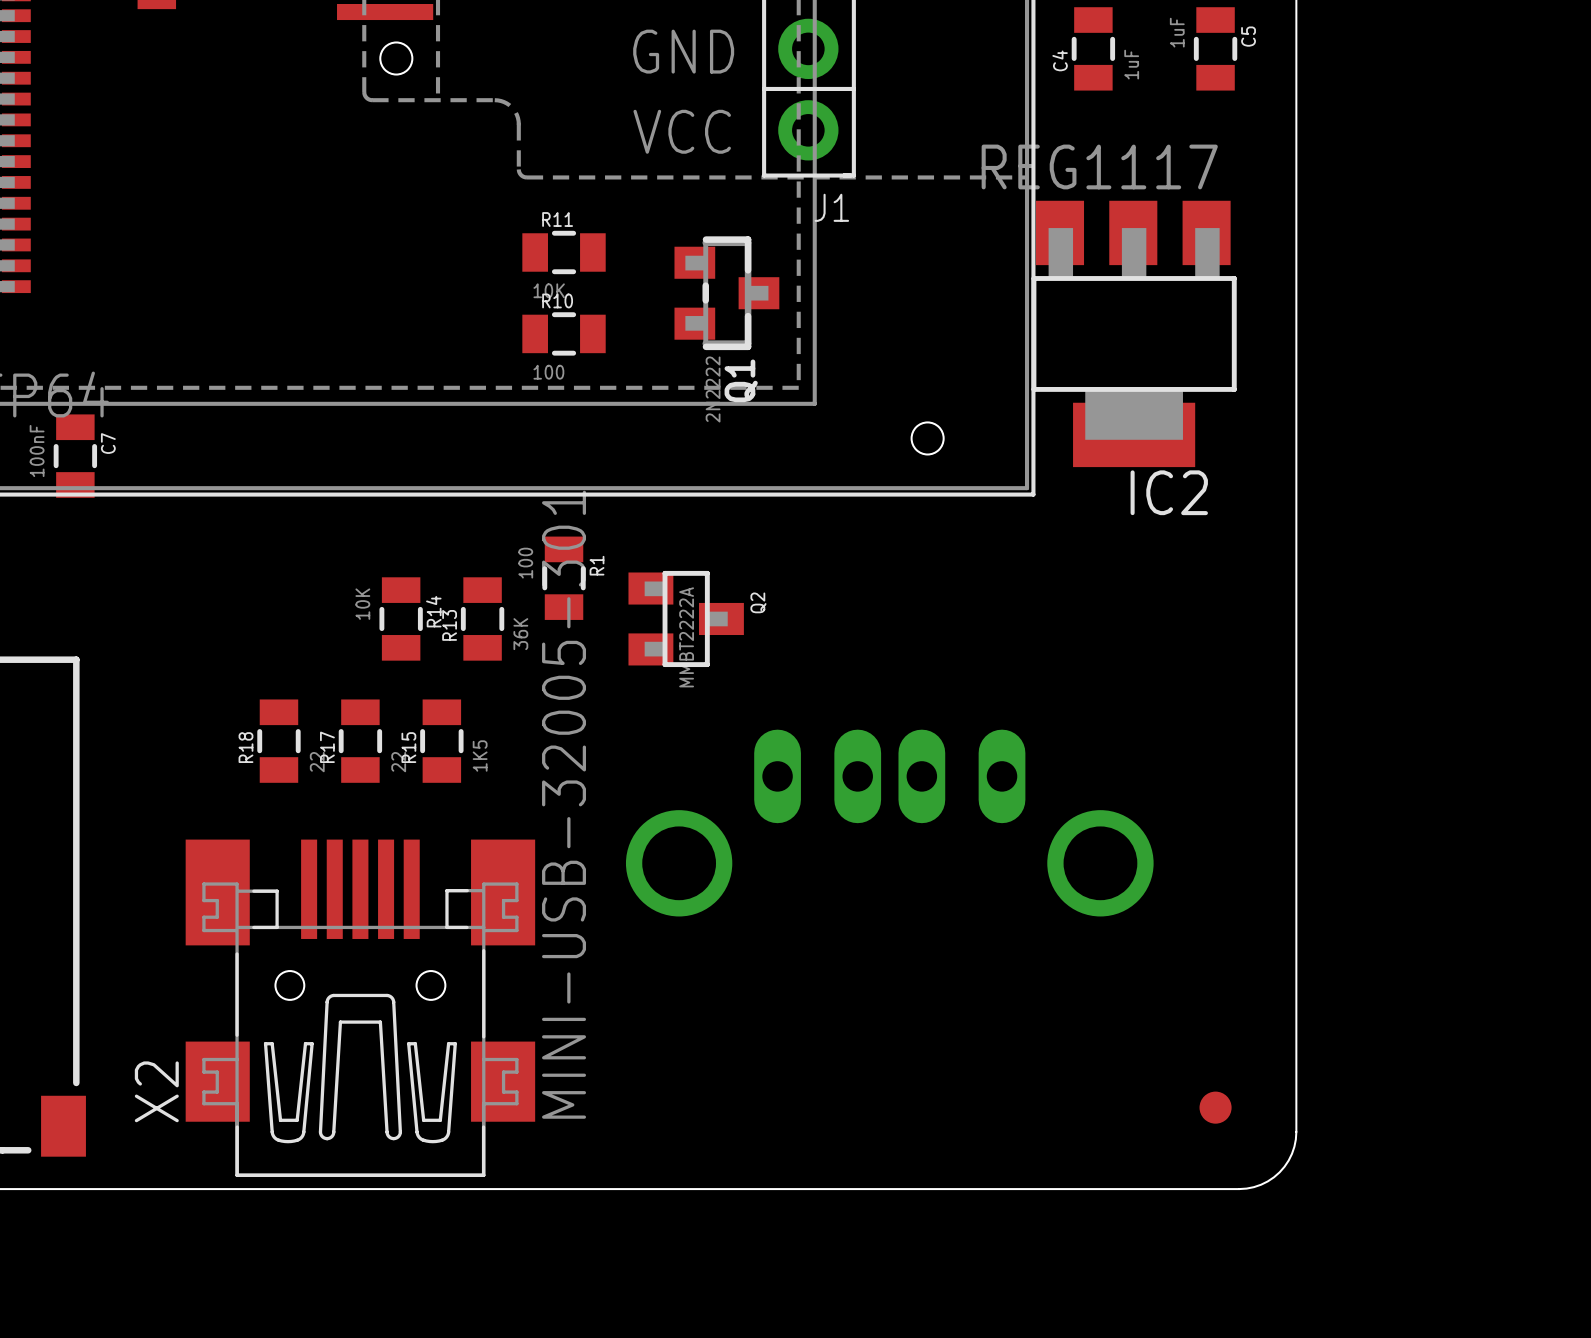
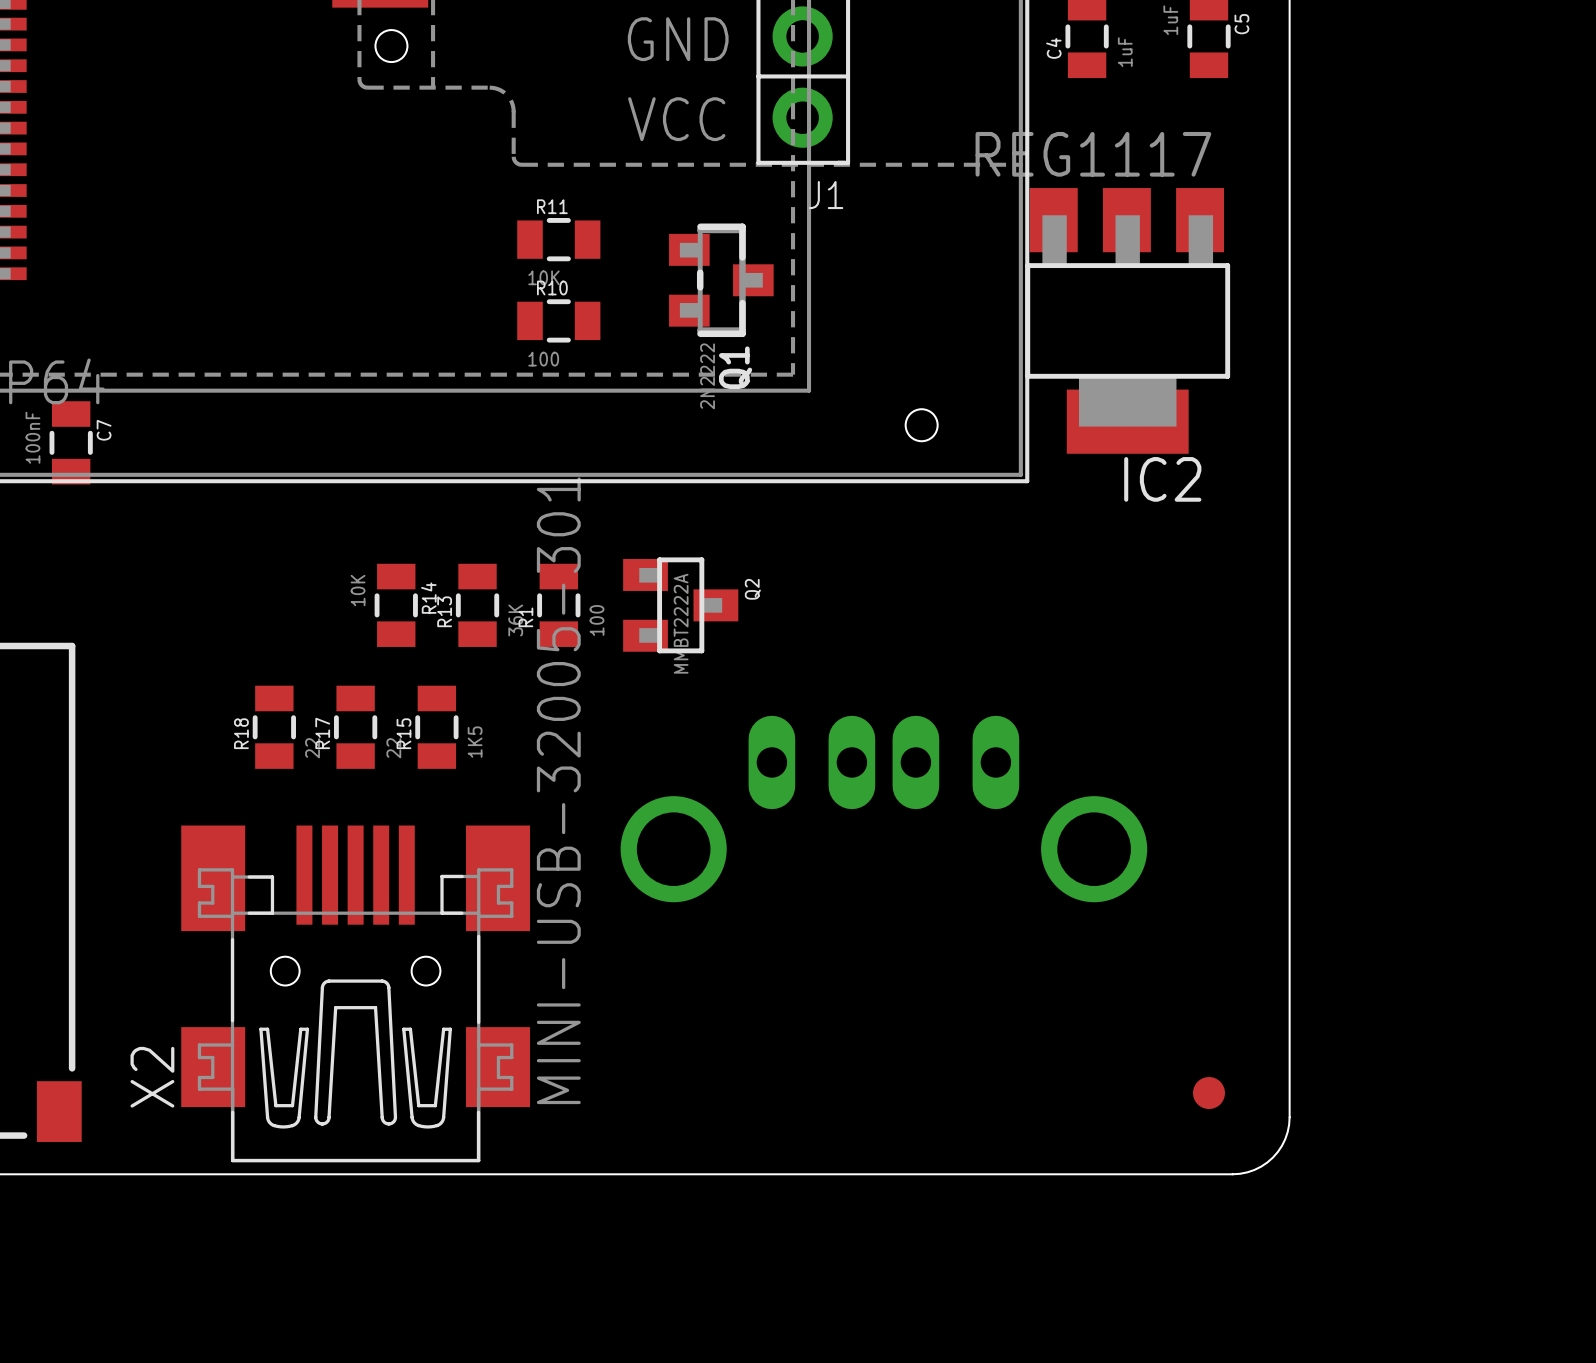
R1 value position: 100 (525, 563) -> 100 (597, 620)
R1 name position: R1 (597, 565) -> R1 (525, 617)
R1 position: (564, 578) -> (558, 605)

